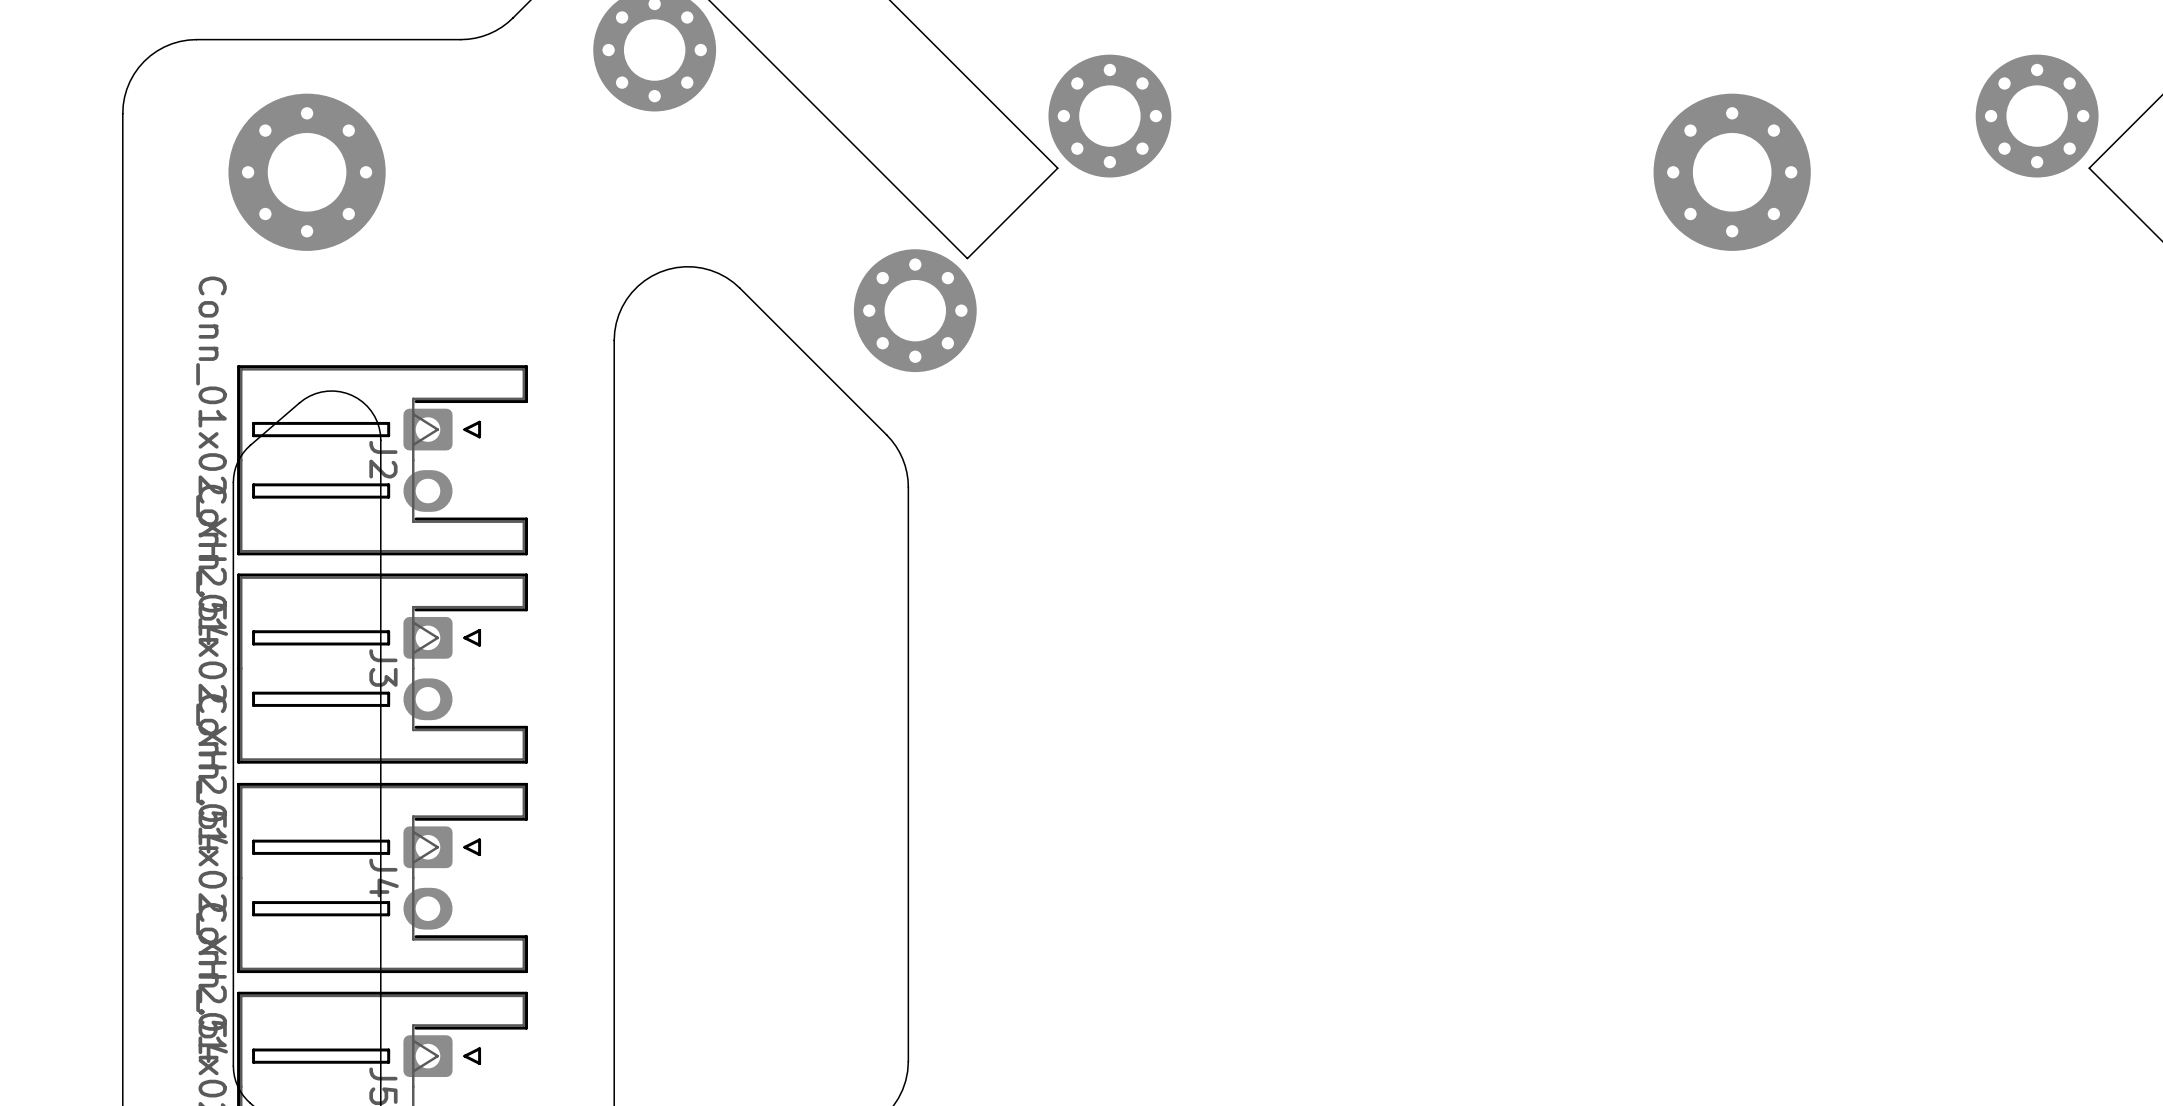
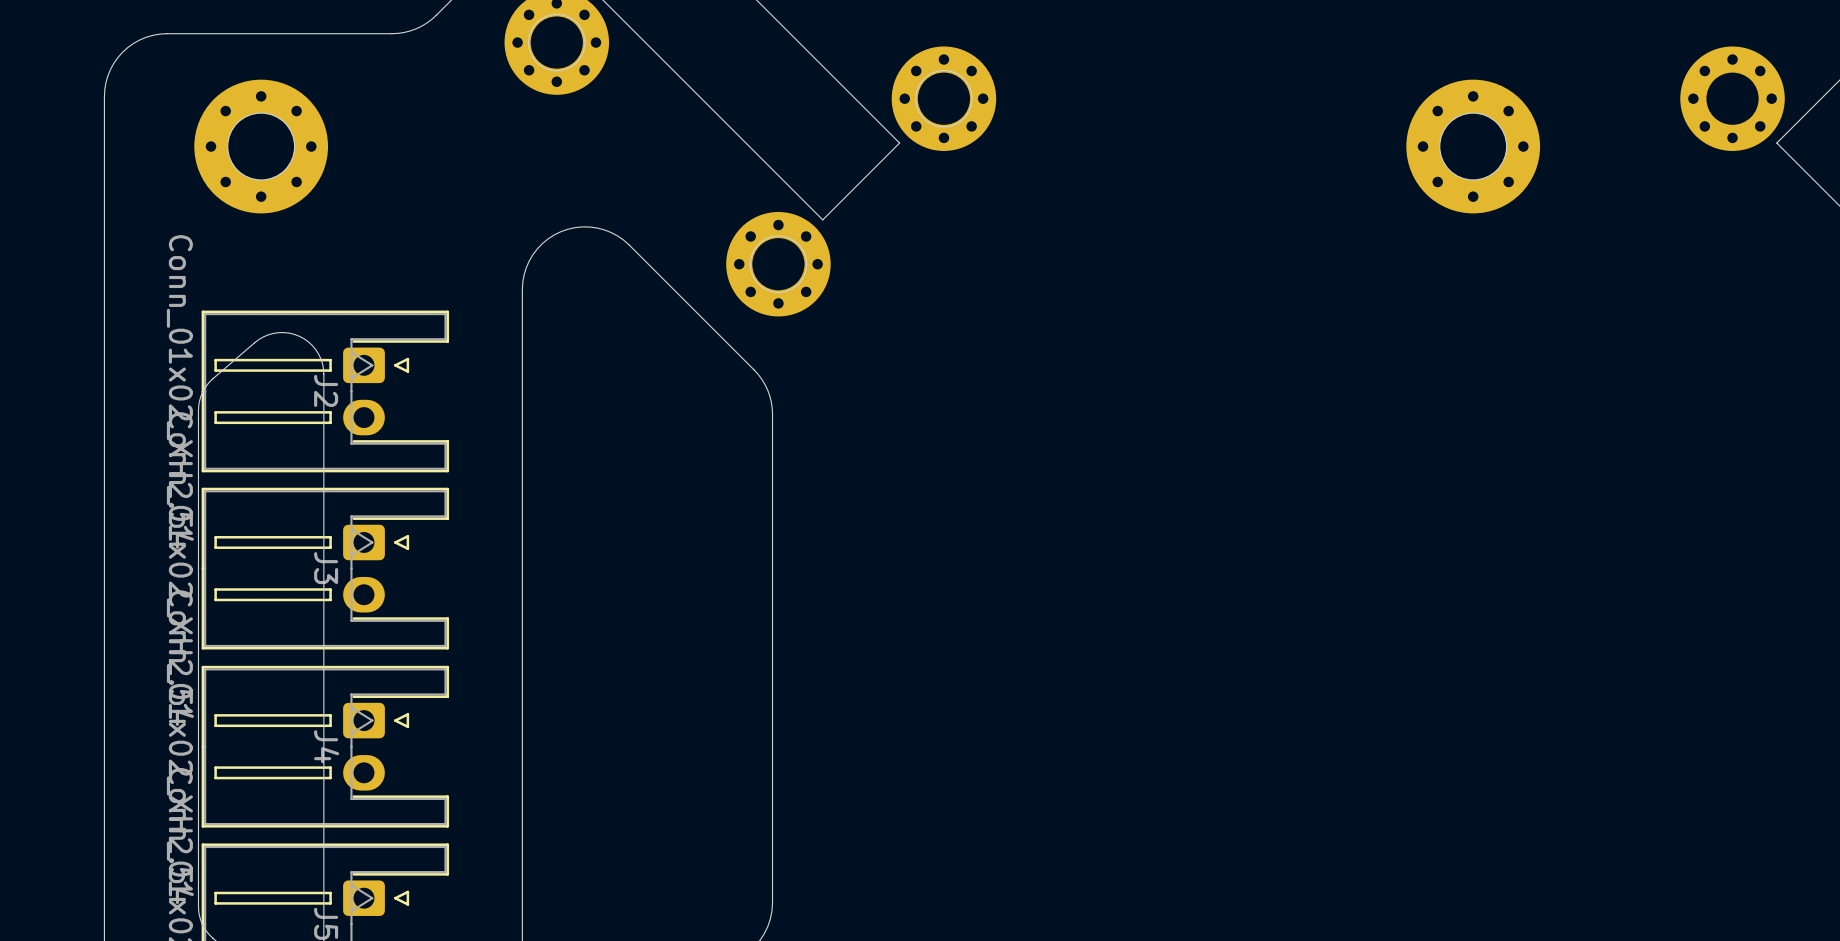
round board edge: none -> [528, 13, 586, 72]
round board edge: none -> [915, 69, 973, 128]
round board edge: none -> [227, 112, 296, 181]
round board edge: none -> [1439, 112, 1508, 181]
round board edge: none -> [749, 235, 808, 293]

